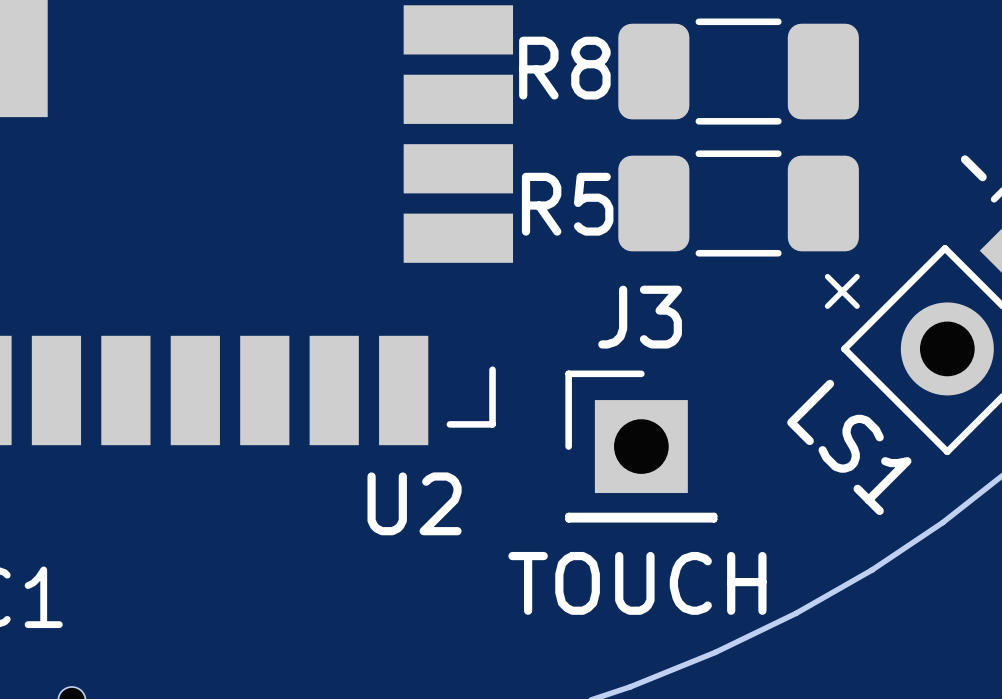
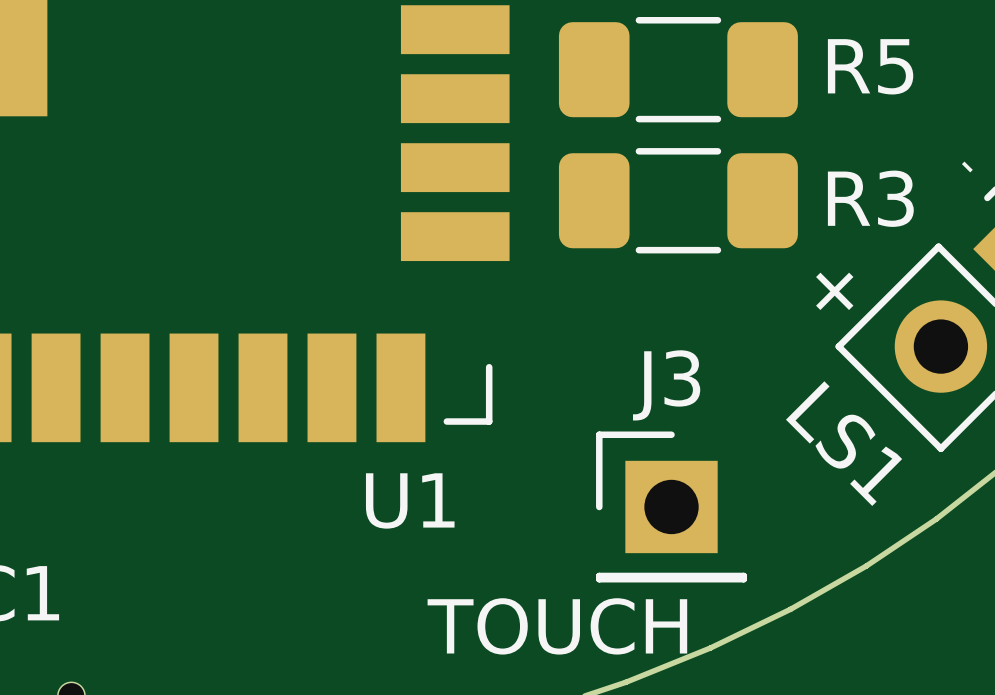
R8: (738, 71) -> none
R3: none -> (678, 200)
R5 position: (738, 203) -> (678, 69)
R5 name position: R5 (567, 204) -> R5 (870, 66)
J3 position: (641, 446) -> (671, 506)
U2 name: U2 (414, 503) -> U1 (410, 500)
J3 value position: TOUCH (637, 583) -> TOUCH (557, 626)

